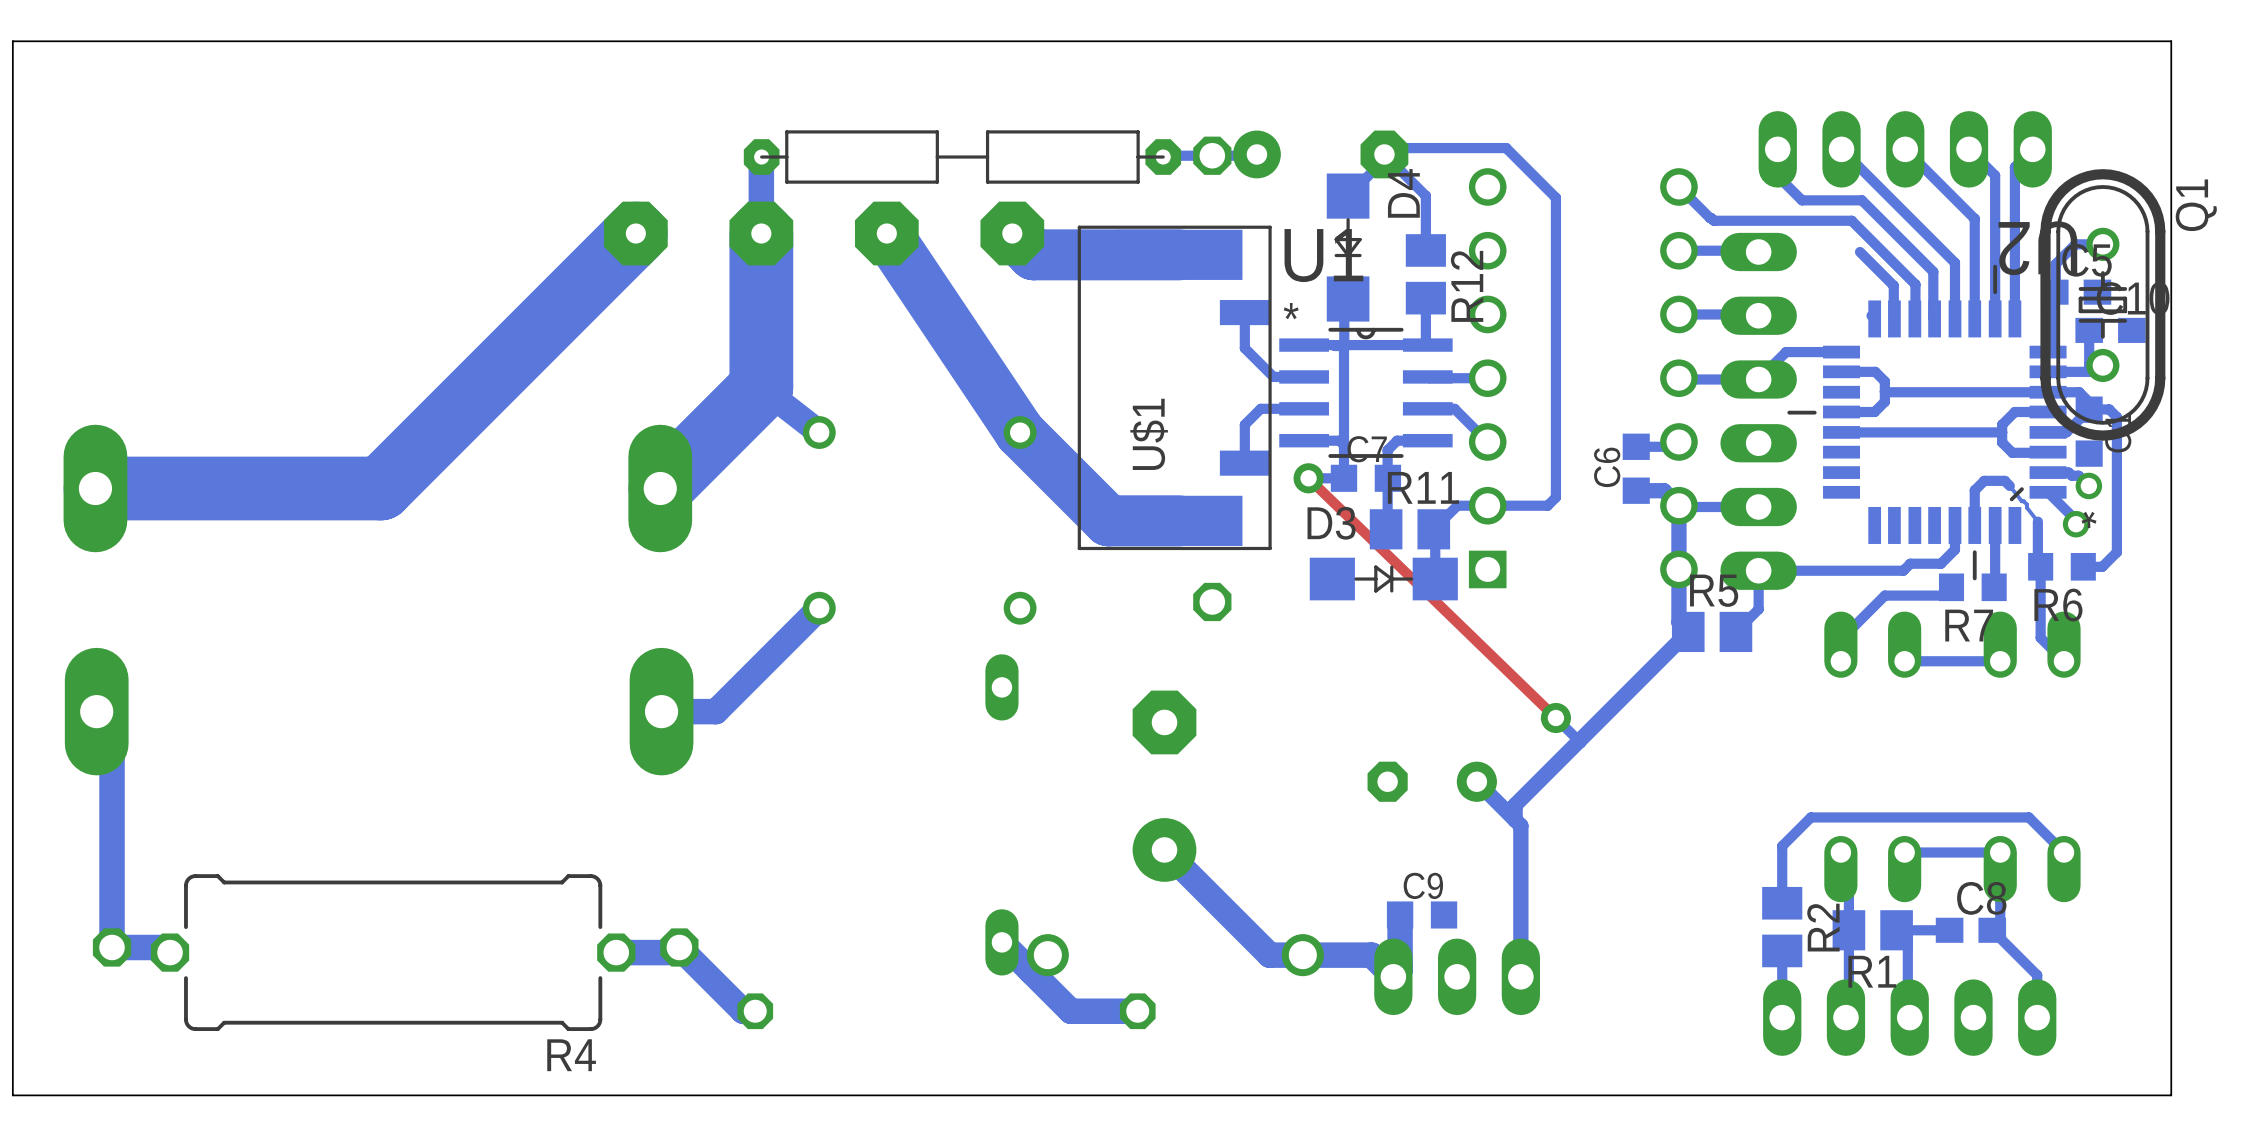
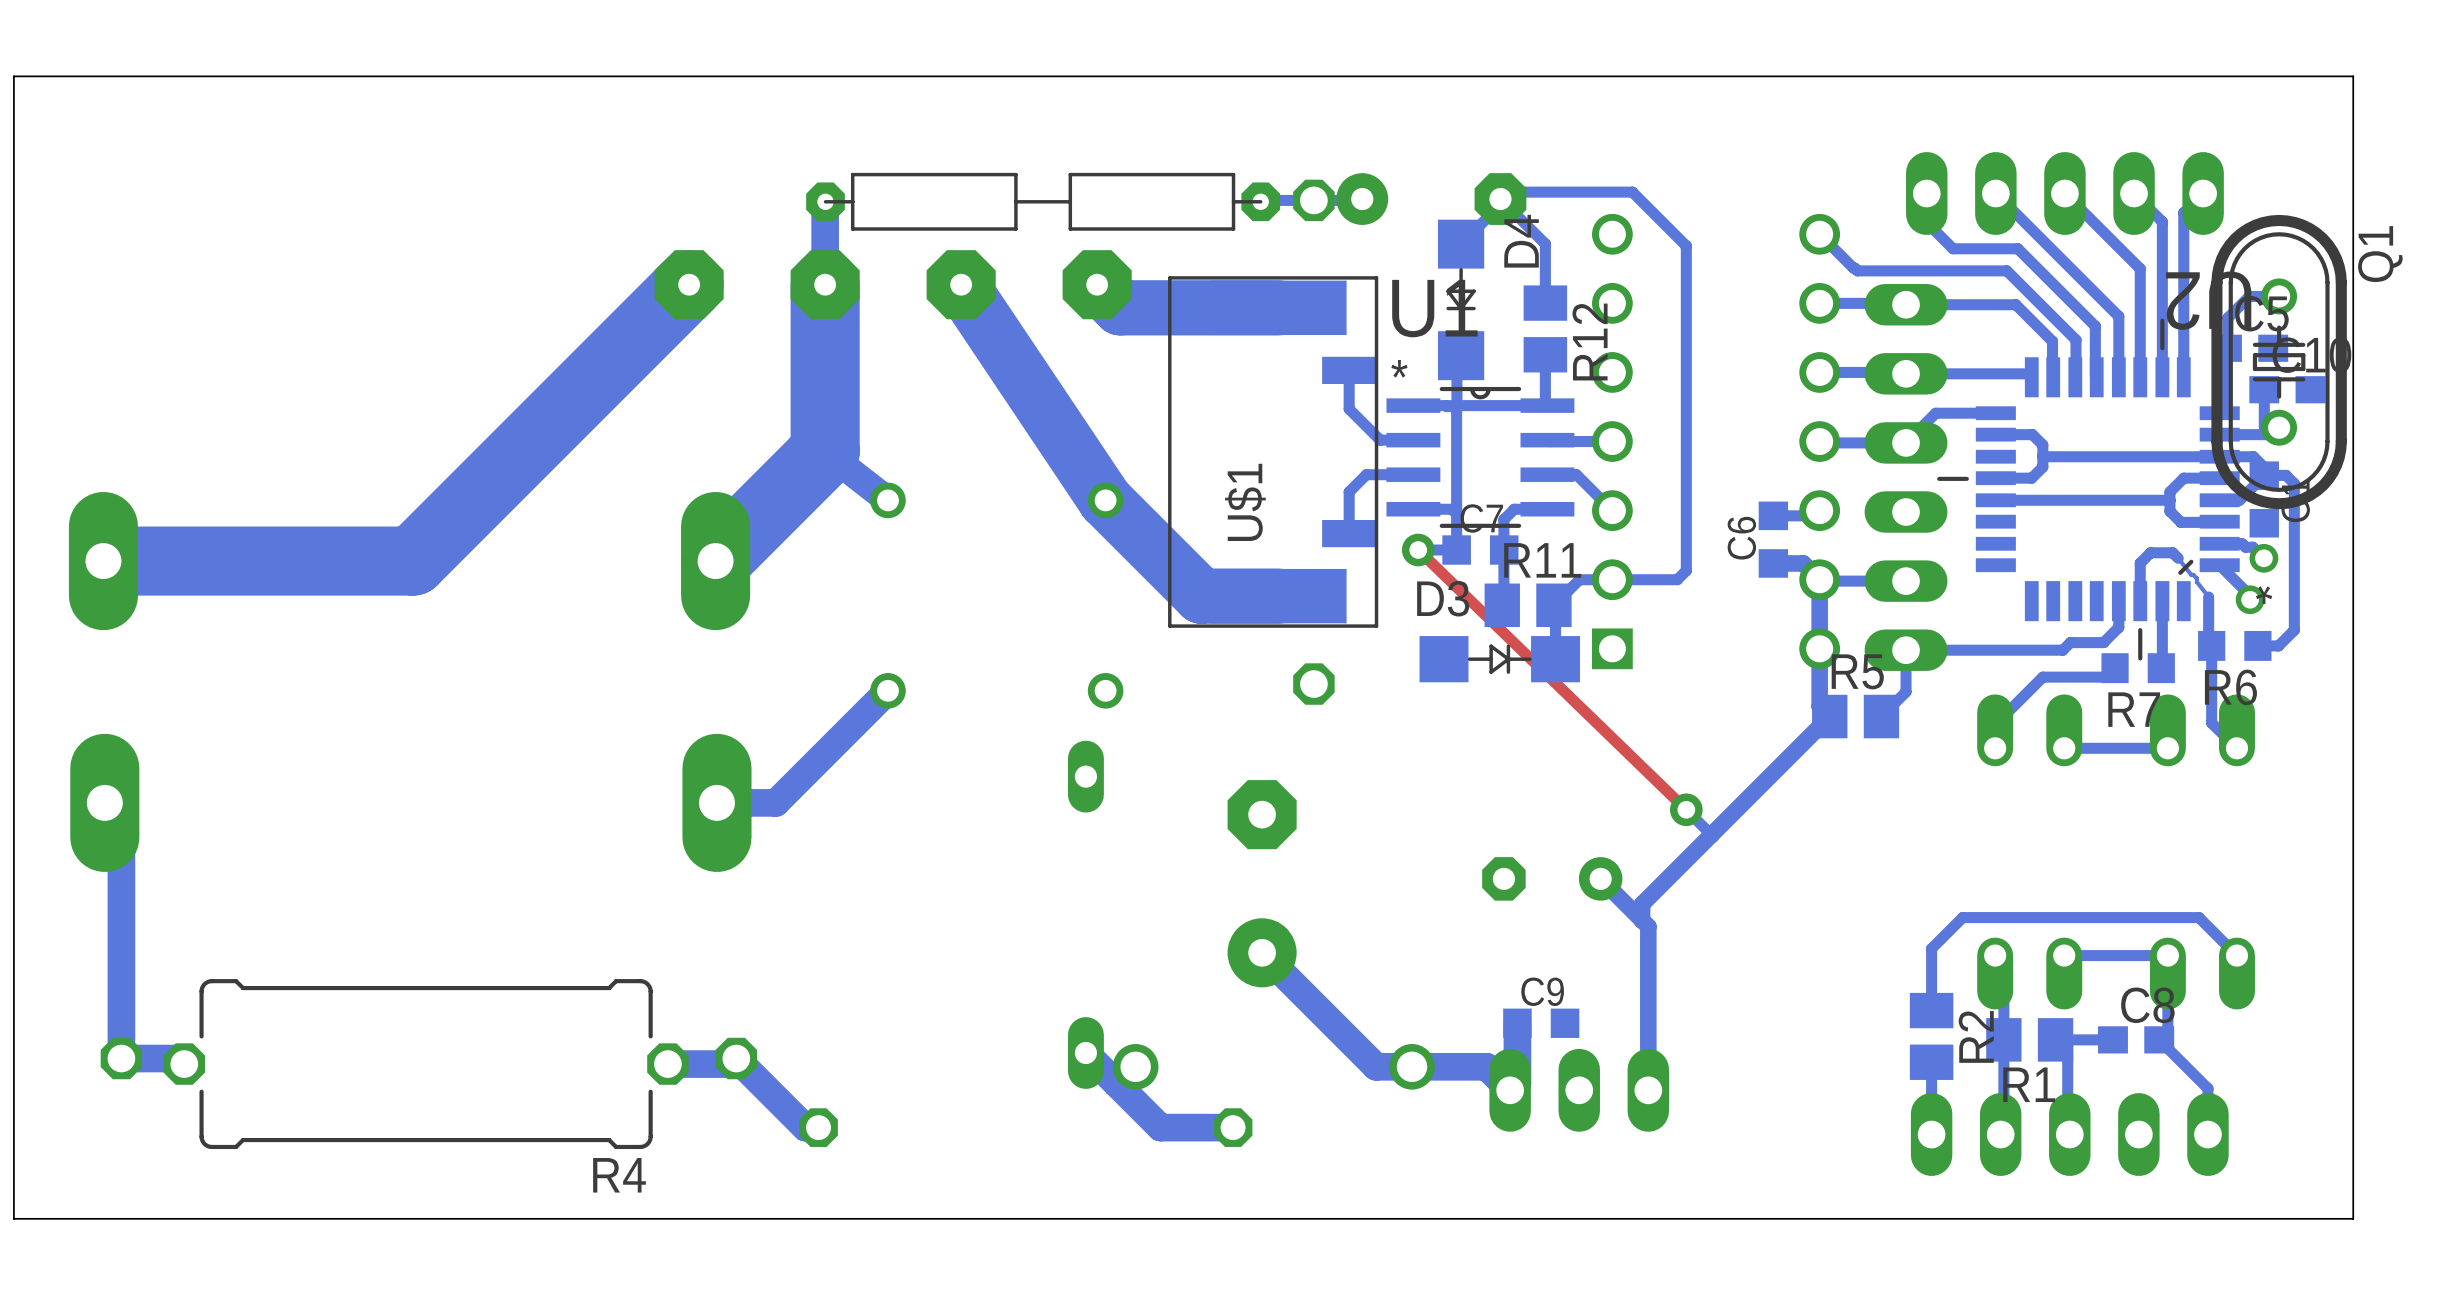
bottom track: none -> (2015, 304) (1906, 304)
bottom track: none -> (2028, 373) (1906, 373)

